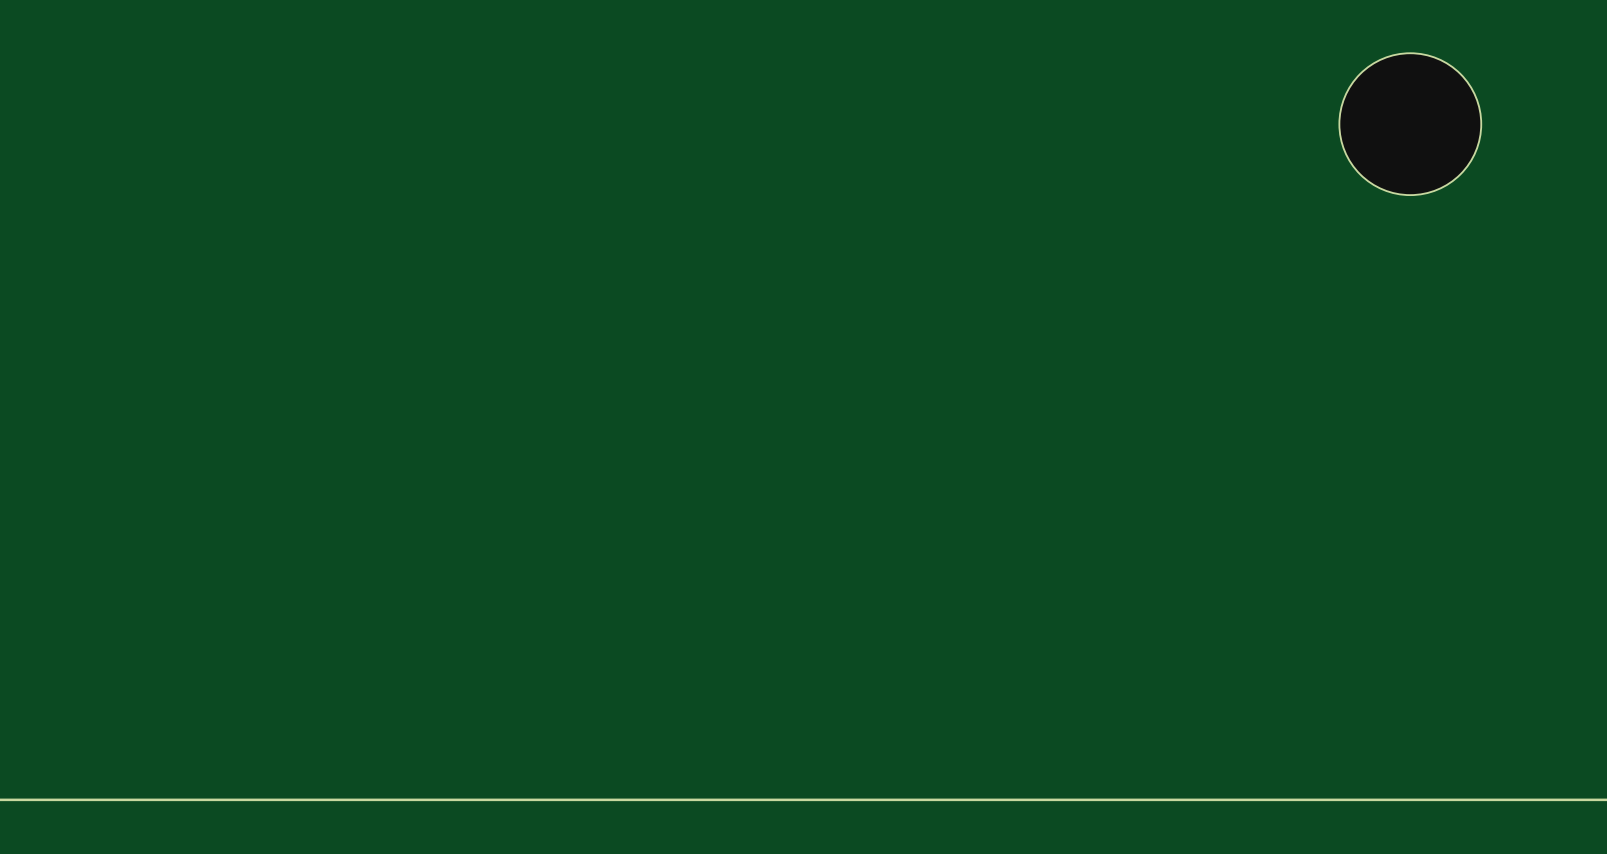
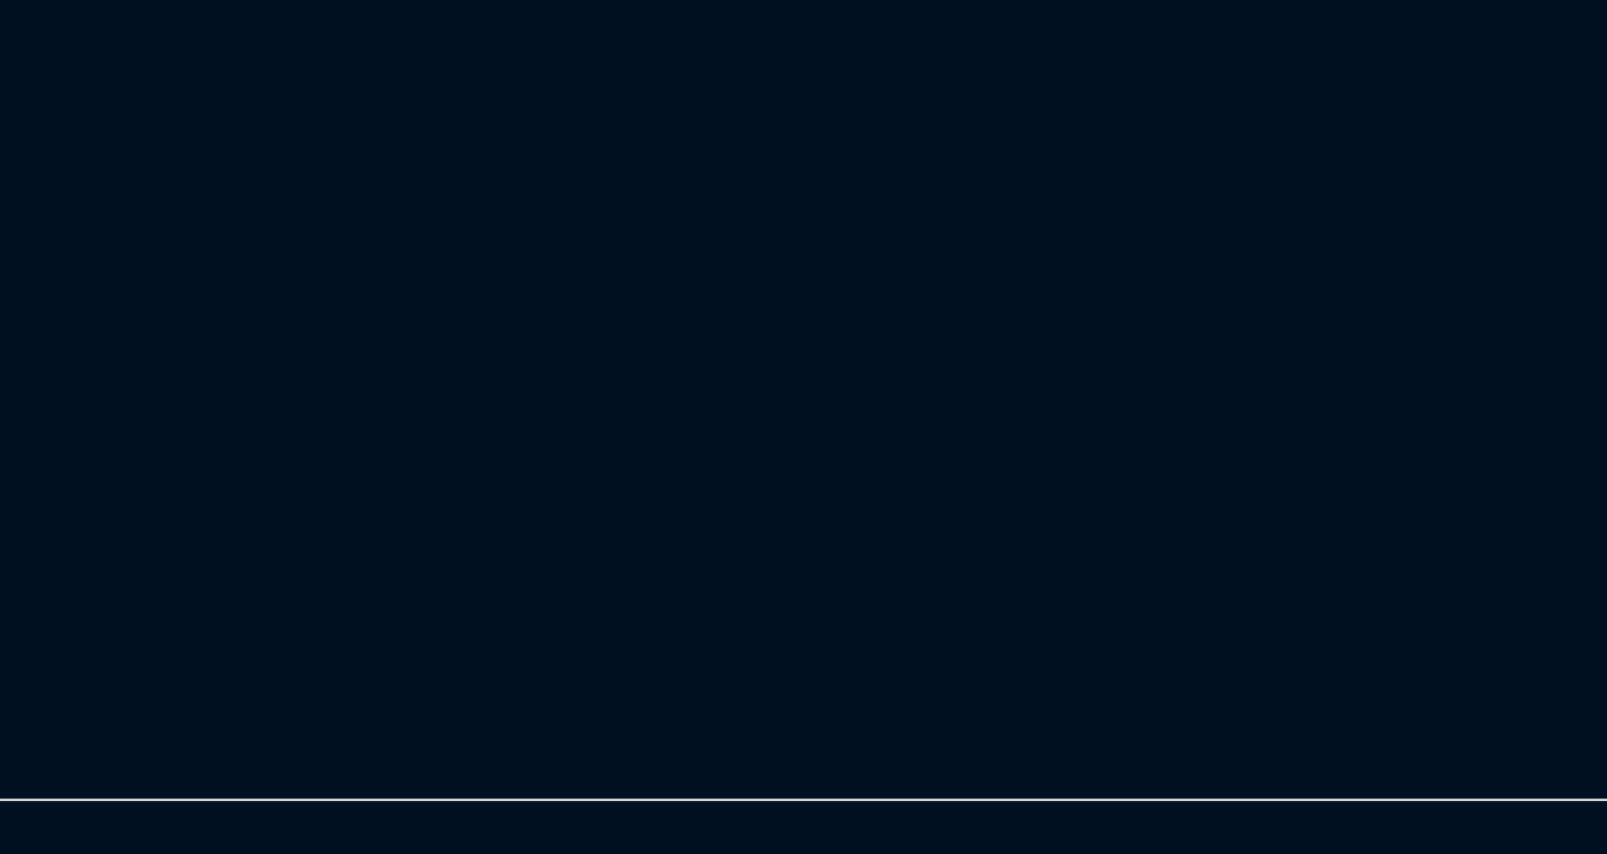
part: (1410, 124) -> none

